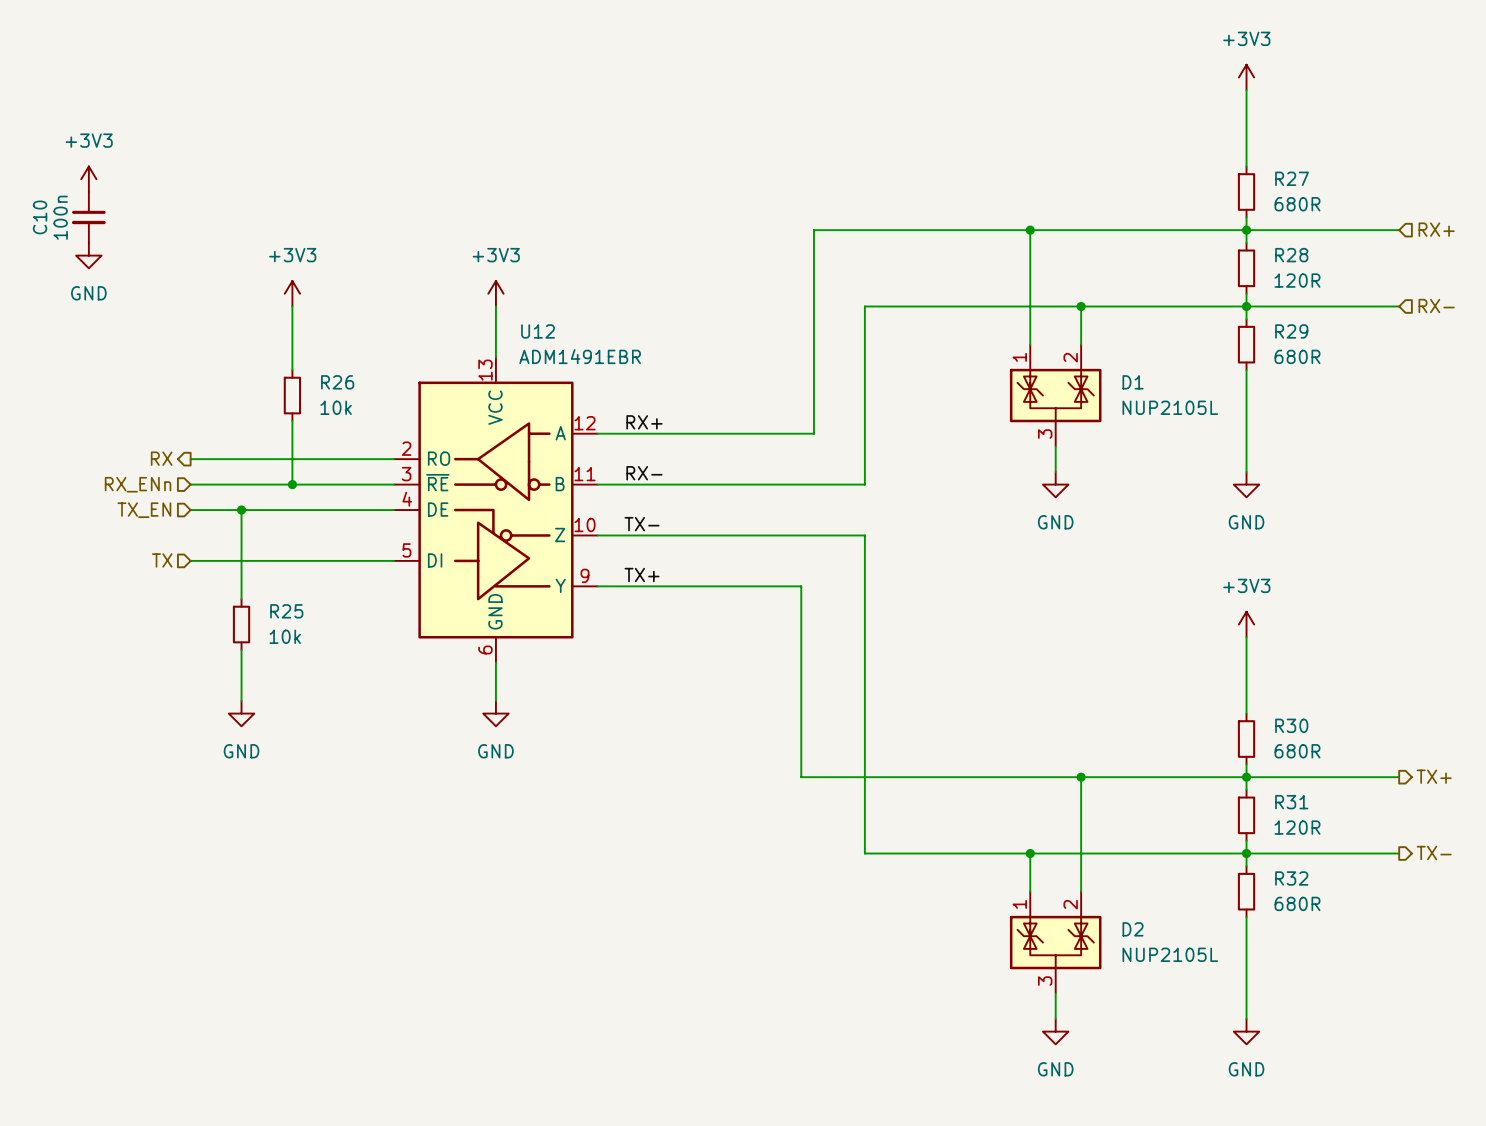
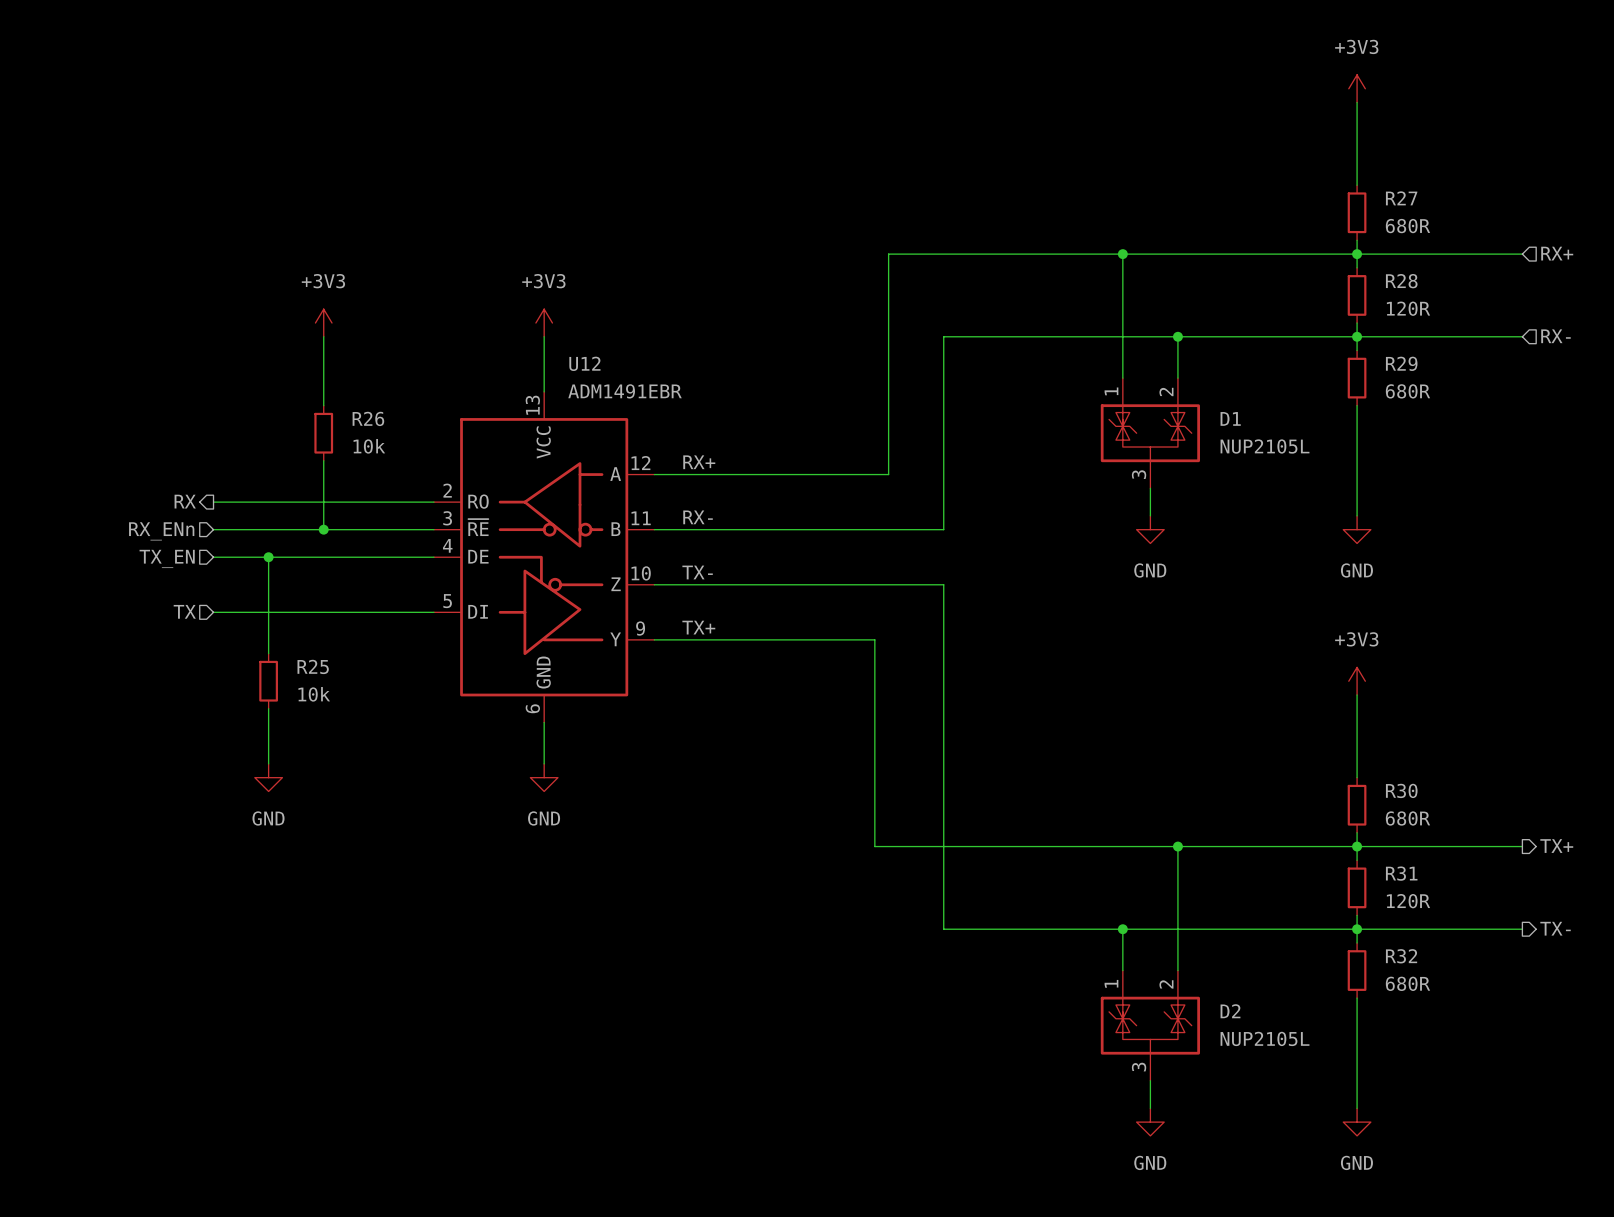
power symbol: +3V3 (88, 179) -> none
C10: 100n (88, 217) -> none
power symbol: GND (88, 255) -> none

